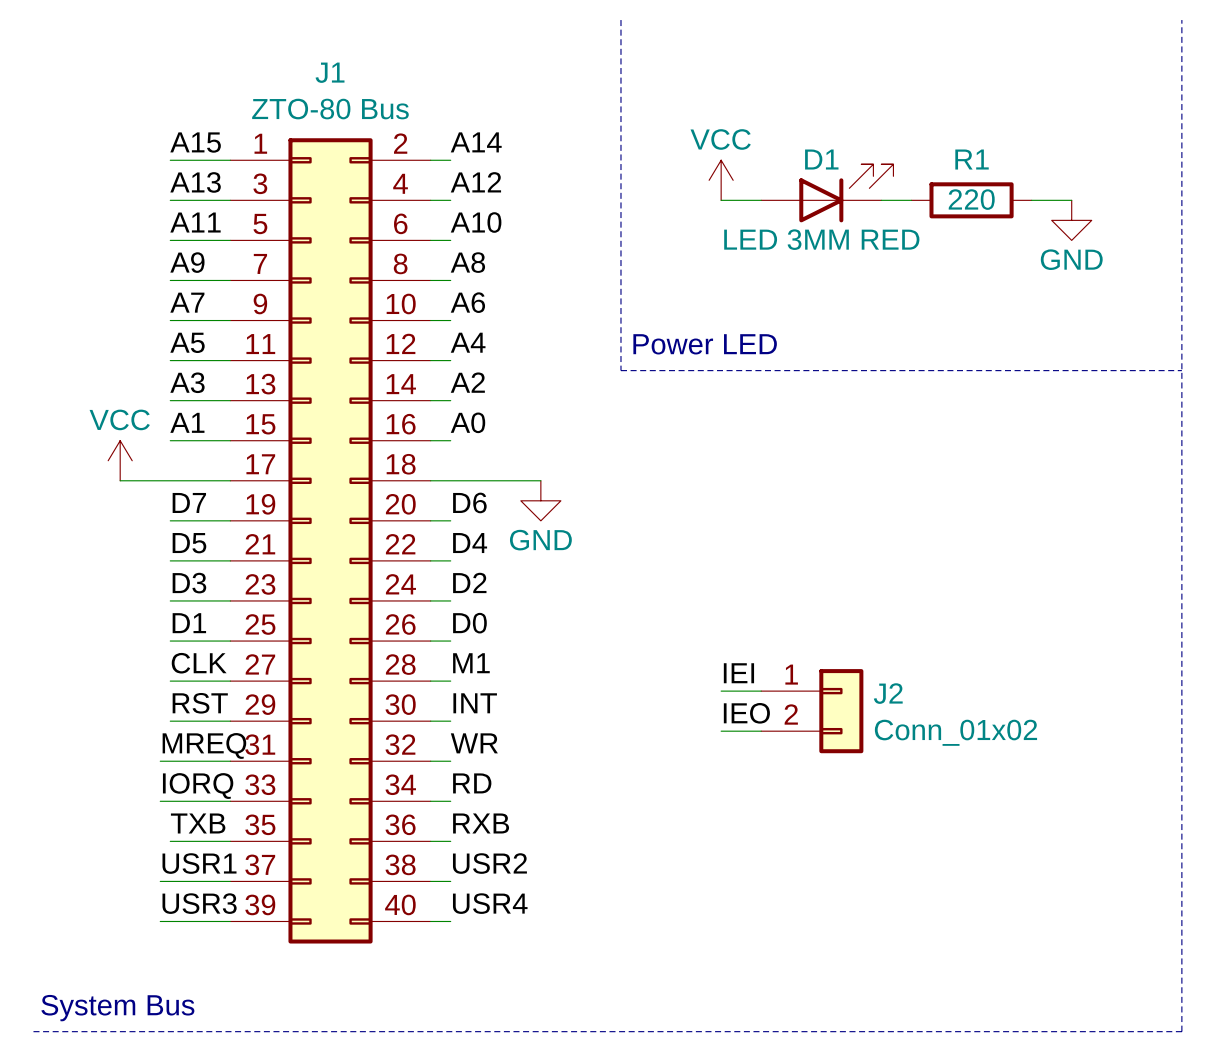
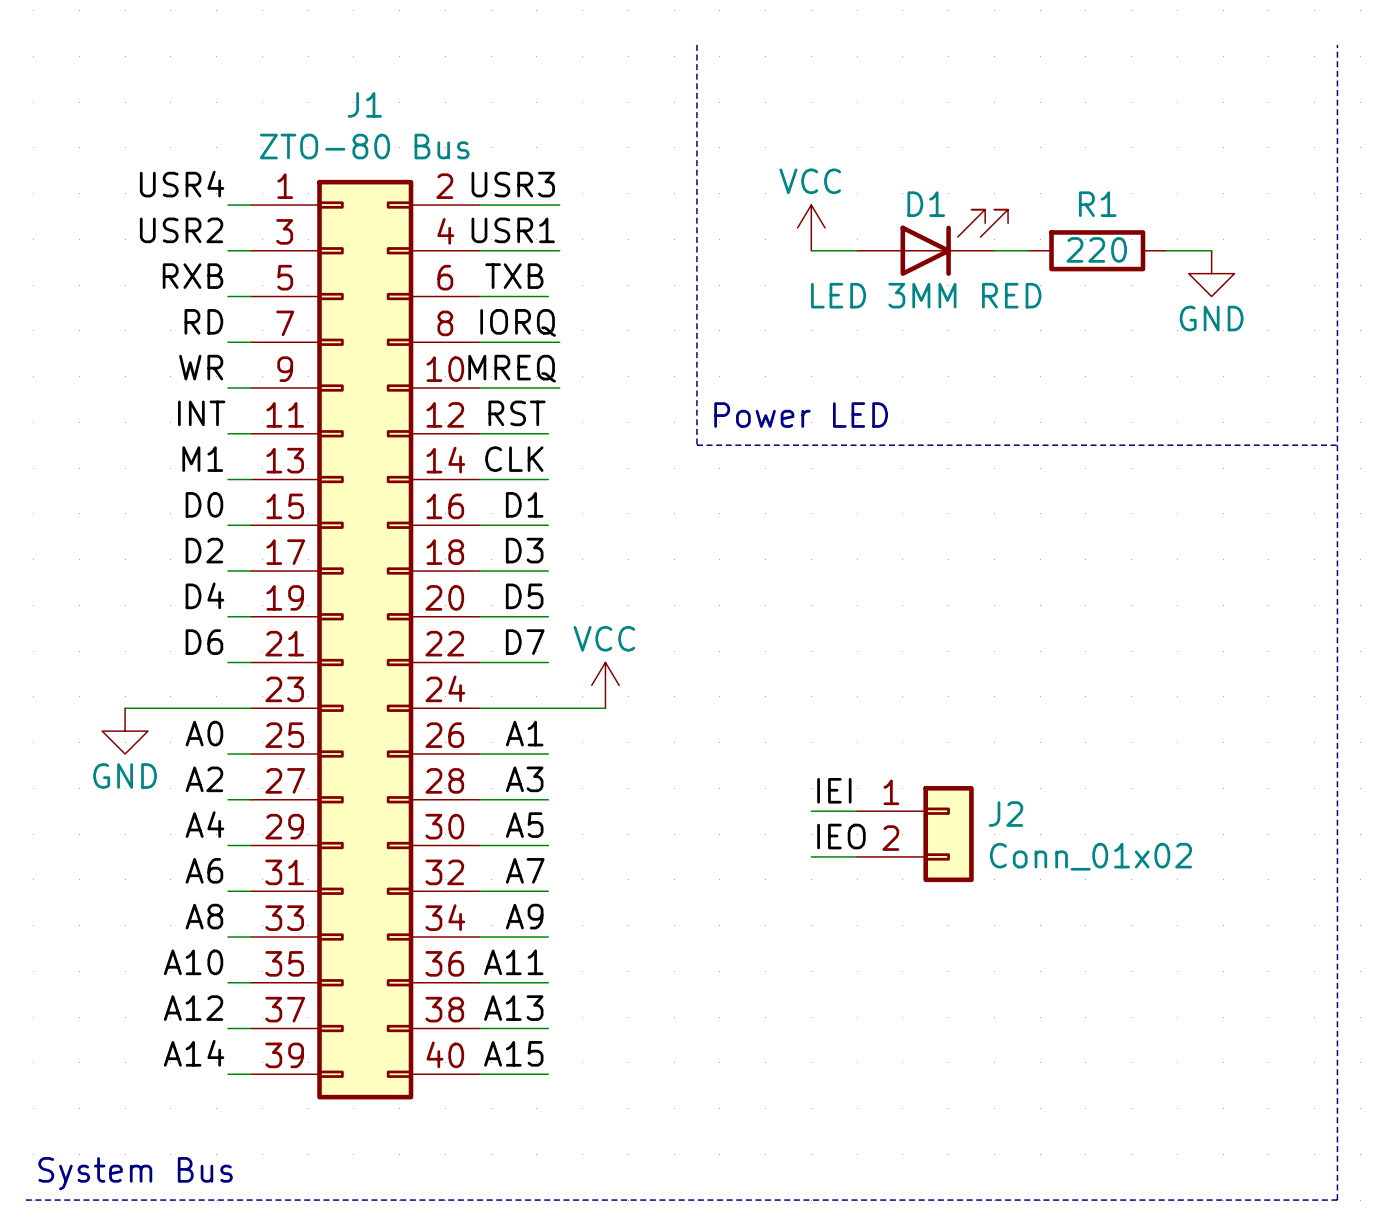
label: none -> USR4 (182, 184)
label: A15 (195, 142) -> none
label: none -> USR3 (513, 184)
label: A14 (476, 142) -> none
wire: (170, 160) (210, 160) -> (502, 433) (548, 433)
wire: none -> (502, 205) (559, 205)
label: none -> USR2 (181, 230)
label: A13 (195, 182) -> none
label: none -> USR1 (513, 230)
label: A12 (475, 182) -> none
wire: (170, 200) (210, 200) -> (502, 479) (548, 479)
wire: none -> (502, 250) (559, 250)
label: none -> RXB (192, 276)
label: A11 (195, 222) -> none
label: none -> TXB (514, 276)
label: A10 (476, 222) -> none
wire: (170, 240) (210, 240) -> (502, 525) (548, 525)
label: A9 (187, 262) -> none
label: none -> RD (203, 321)
label: A8 (467, 262) -> none
label: none -> IORQ (518, 322)
wire: (170, 280) (210, 280) -> (502, 296) (548, 296)
wire: none -> (502, 342) (559, 342)
label: none -> WR (201, 367)
label: A7 (187, 302) -> none
label: A6 (467, 302) -> none
label: none -> MREQ (512, 368)
wire: (170, 320) (210, 320) -> (502, 616) (548, 616)
label: A5 (187, 342) -> none
label: none -> INT (201, 413)
label: none -> RST (517, 413)
label: A4 (468, 342) -> none
wire: (170, 360) (210, 360) -> (502, 662) (548, 662)
label: A3 (187, 382) -> none
label: none -> CLK (514, 459)
label position: A2 (467, 382) -> A2 (204, 779)
wire: (170, 400) (210, 400) -> none
label position: A1 (187, 422) -> A1 (524, 733)
label position: A0 (467, 422) -> A0 (204, 733)
wire: (170, 440) (210, 440) -> (502, 754) (548, 754)
power symbol: VCC (120, 460) -> none
wire: (120, 480) (210, 480) -> (502, 708) (605, 708)
wire: (490, 480) (540, 480) -> (502, 388) (559, 388)
power symbol: GND (540, 500) -> none
label position: D7 (189, 502) -> D7 (525, 642)
label position: D6 (469, 502) -> D6 (204, 642)
wire: (170, 520) (210, 520) -> (502, 845) (548, 845)
label position: D5 (189, 543) -> D5 (524, 596)
label position: D4 (470, 543) -> D4 (204, 595)
wire: (170, 560) (210, 560) -> (502, 891) (548, 891)
power symbol: none -> VCC (605, 685)
label position: D2 (469, 582) -> D2 (204, 550)
label position: D3 (189, 583) -> D3 (524, 550)
power symbol: none -> GND (125, 731)
label position: D1 (189, 623) -> D1 (524, 504)
label position: D0 (469, 623) -> D0 (204, 504)
wire: (170, 641) (210, 641) -> (502, 982) (548, 982)
label: CLK (199, 663) -> none
label position: M1 (471, 663) -> M1 (202, 459)
label: none -> A3 (524, 779)
wire: (170, 681) (210, 681) -> (502, 1028) (548, 1028)
wire: none -> (502, 799) (548, 799)
label: none -> A4 (204, 824)
label: RST (200, 703) -> none
label: none -> A5 (524, 825)
label: INT (475, 703) -> none
wire: (170, 721) (210, 721) -> (502, 1074) (548, 1074)
label: none -> A6 (204, 870)
label: none -> A7 (525, 870)
label: WR (474, 743) -> none
label: MREQ (204, 745) -> none
wire: (160, 761) (210, 761) -> (125, 708) (182, 708)
label: none -> A8 (204, 916)
label: RD (472, 783) -> none
label: none -> A9 (524, 916)
label: IORQ (198, 786) -> none
wire: (160, 801) (210, 801) -> none
label: none -> A10 (193, 962)
label: TXB (198, 823) -> none
label: none -> A11 (513, 962)
label: RXB (481, 823) -> none
wire: (170, 841) (210, 841) -> (502, 937) (548, 937)
label: none -> A12 (193, 1008)
label: USR1 (199, 863) -> none
label: none -> A13 (513, 1008)
label: USR2 (489, 863) -> none
wire: (160, 881) (210, 881) -> none
label: none -> A14 (194, 1053)
label: USR3 (199, 903) -> none
label: none -> A15 (513, 1053)
label: USR4 (490, 903) -> none
wire: (160, 921) (210, 921) -> none

